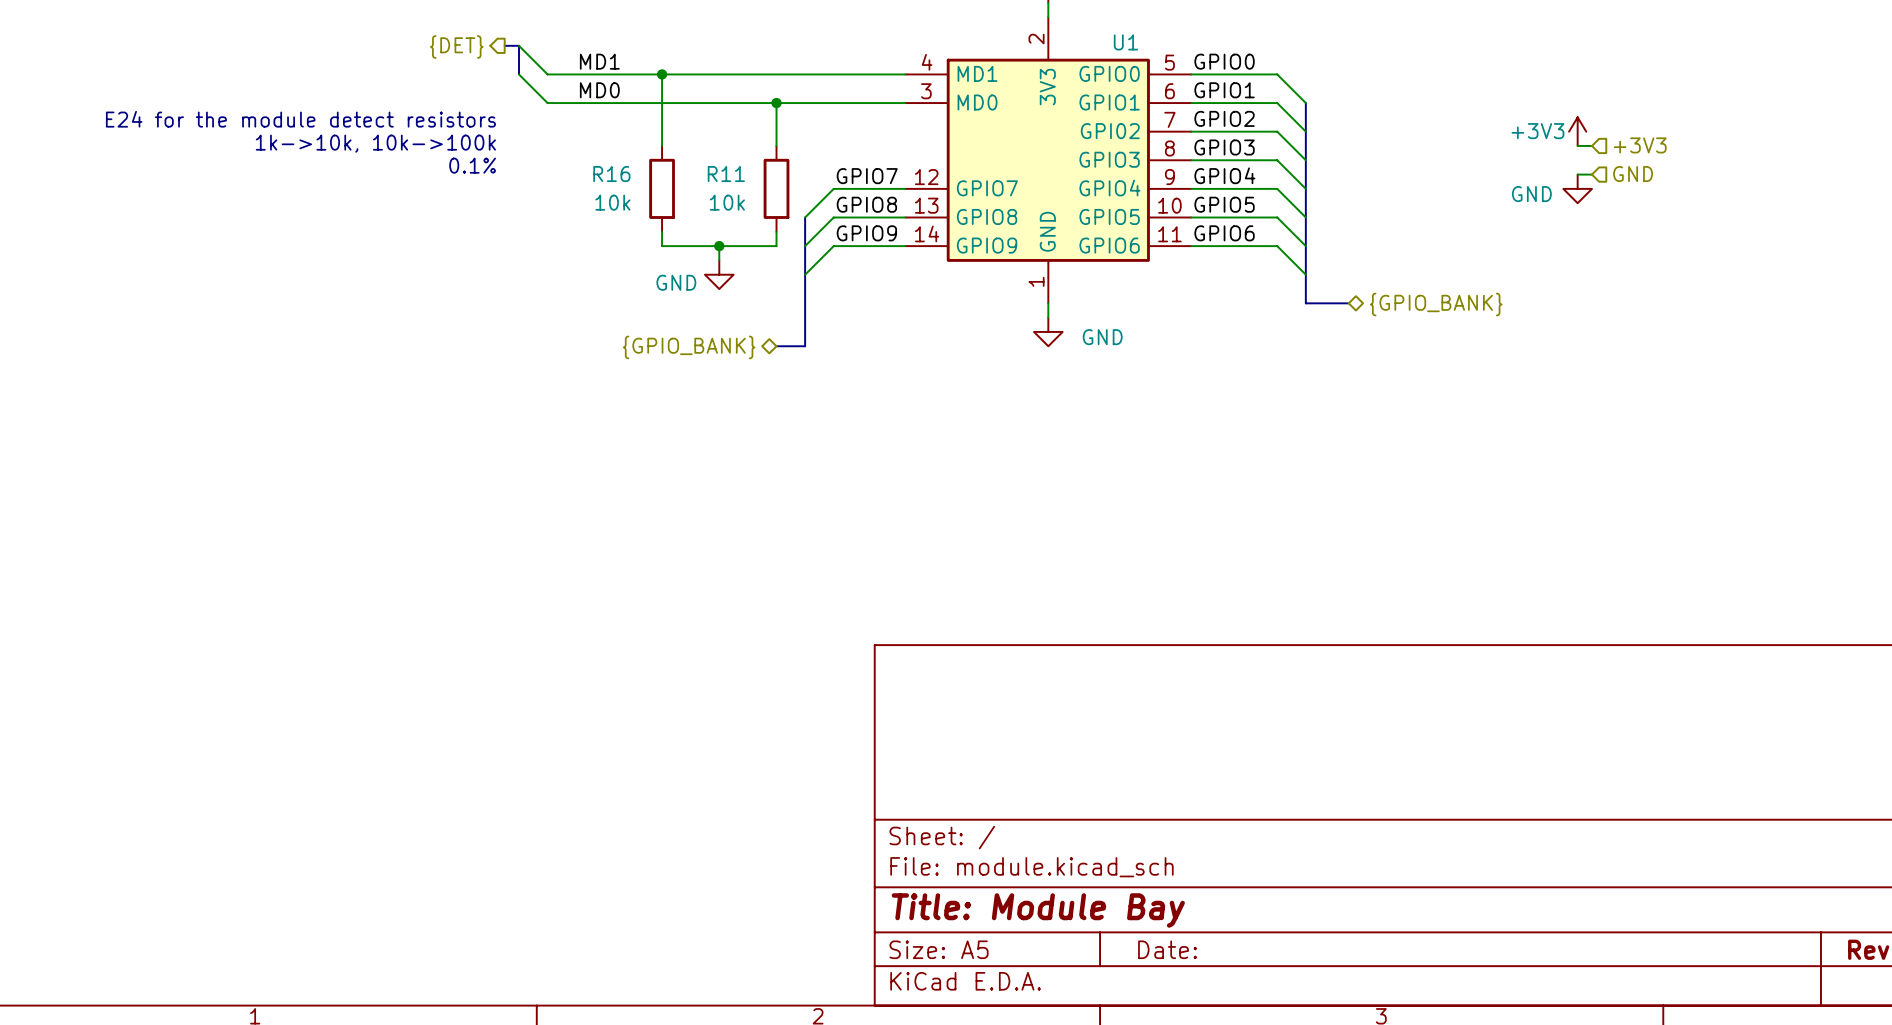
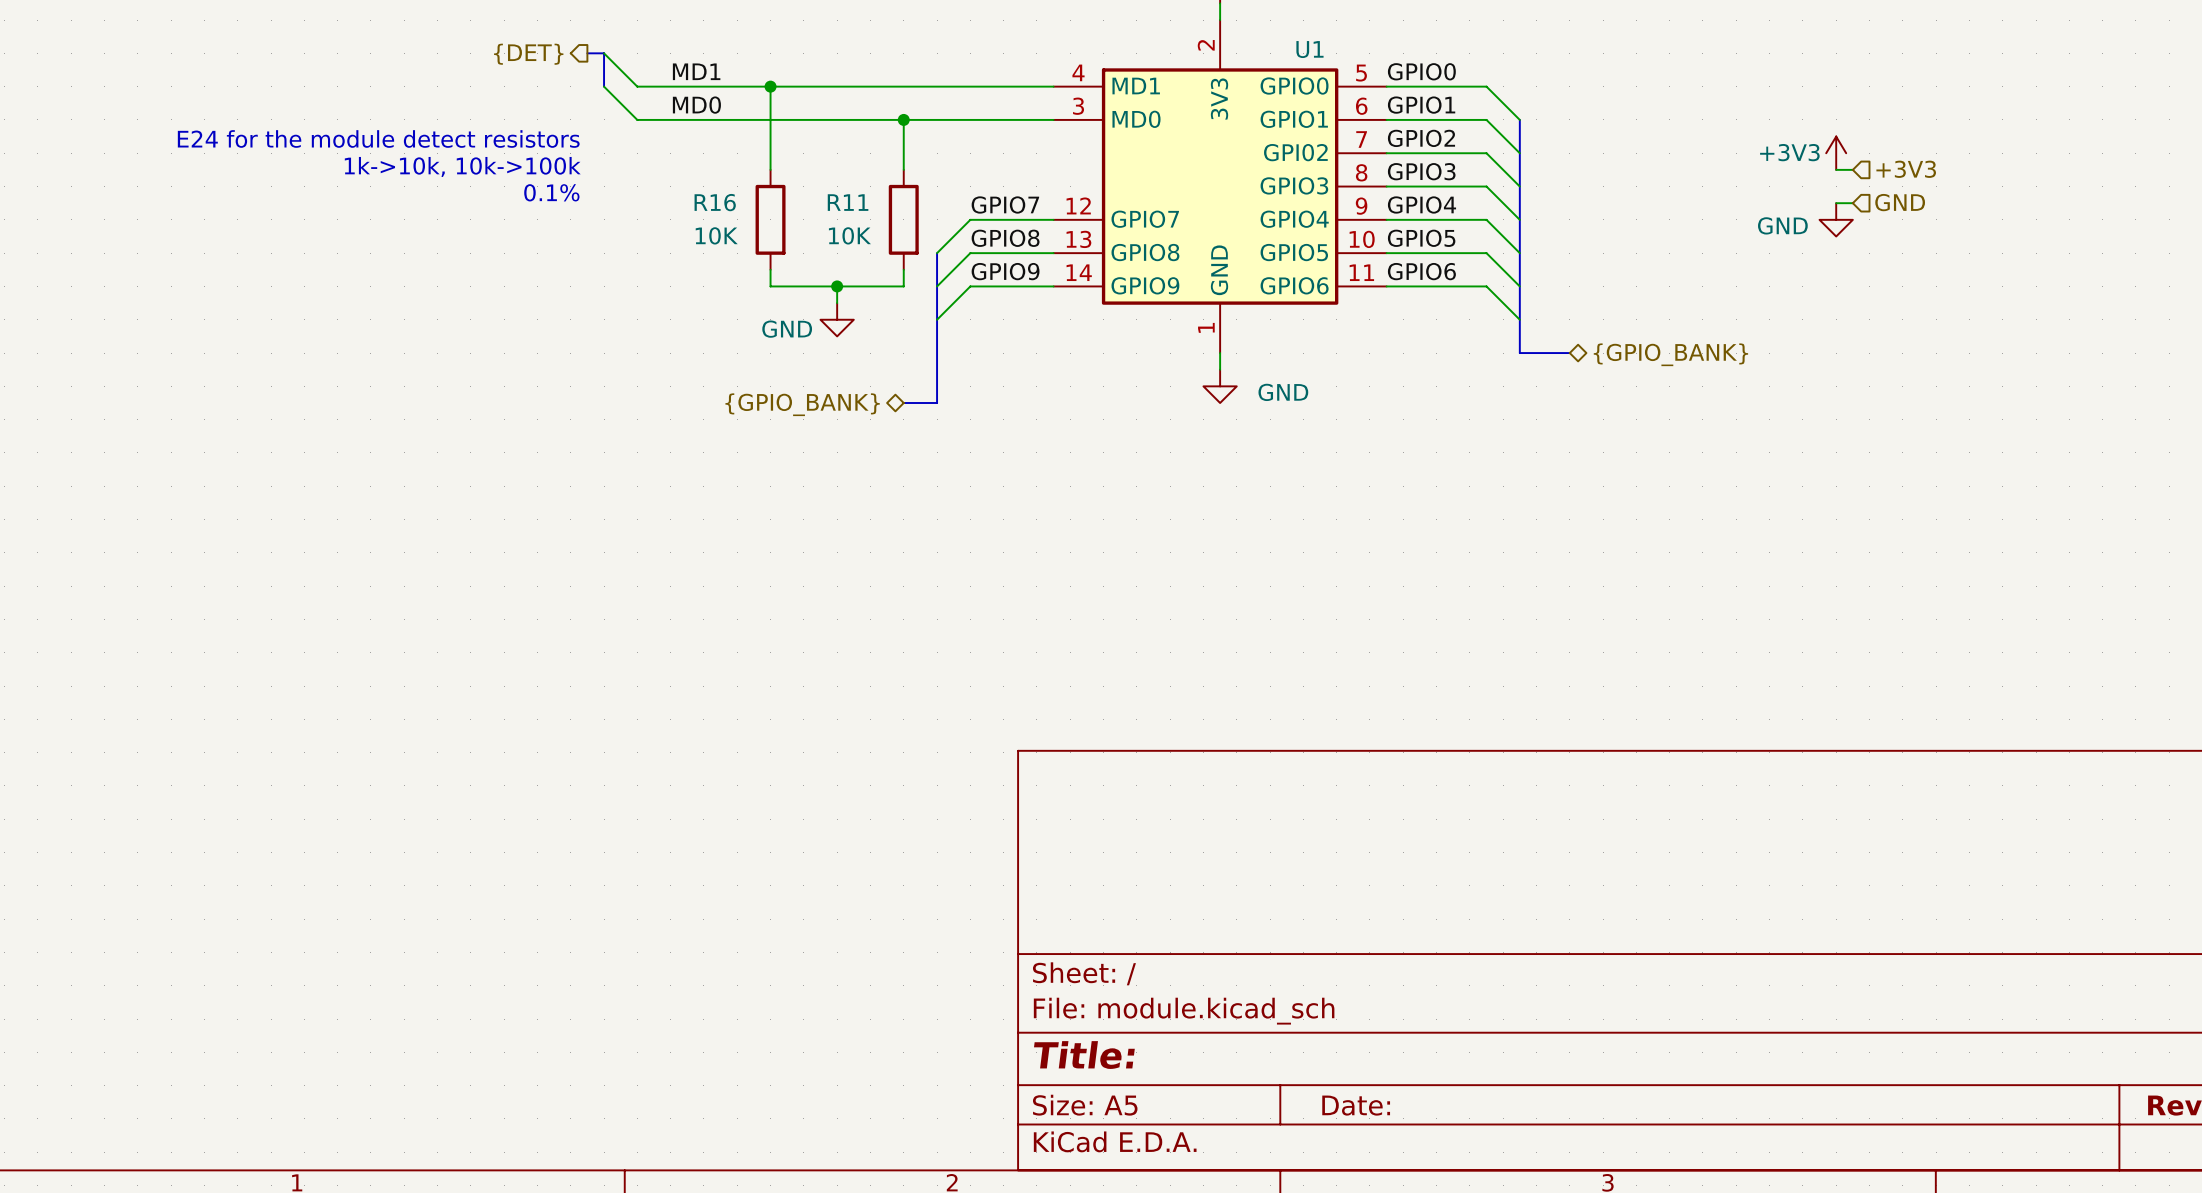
R16 value: 10k (612, 202) -> 10K (716, 235)
R11 value: 10k (727, 202) -> 10K (849, 235)
title block: Title: Module Bay (1038, 910) -> Title: (1084, 1055)

